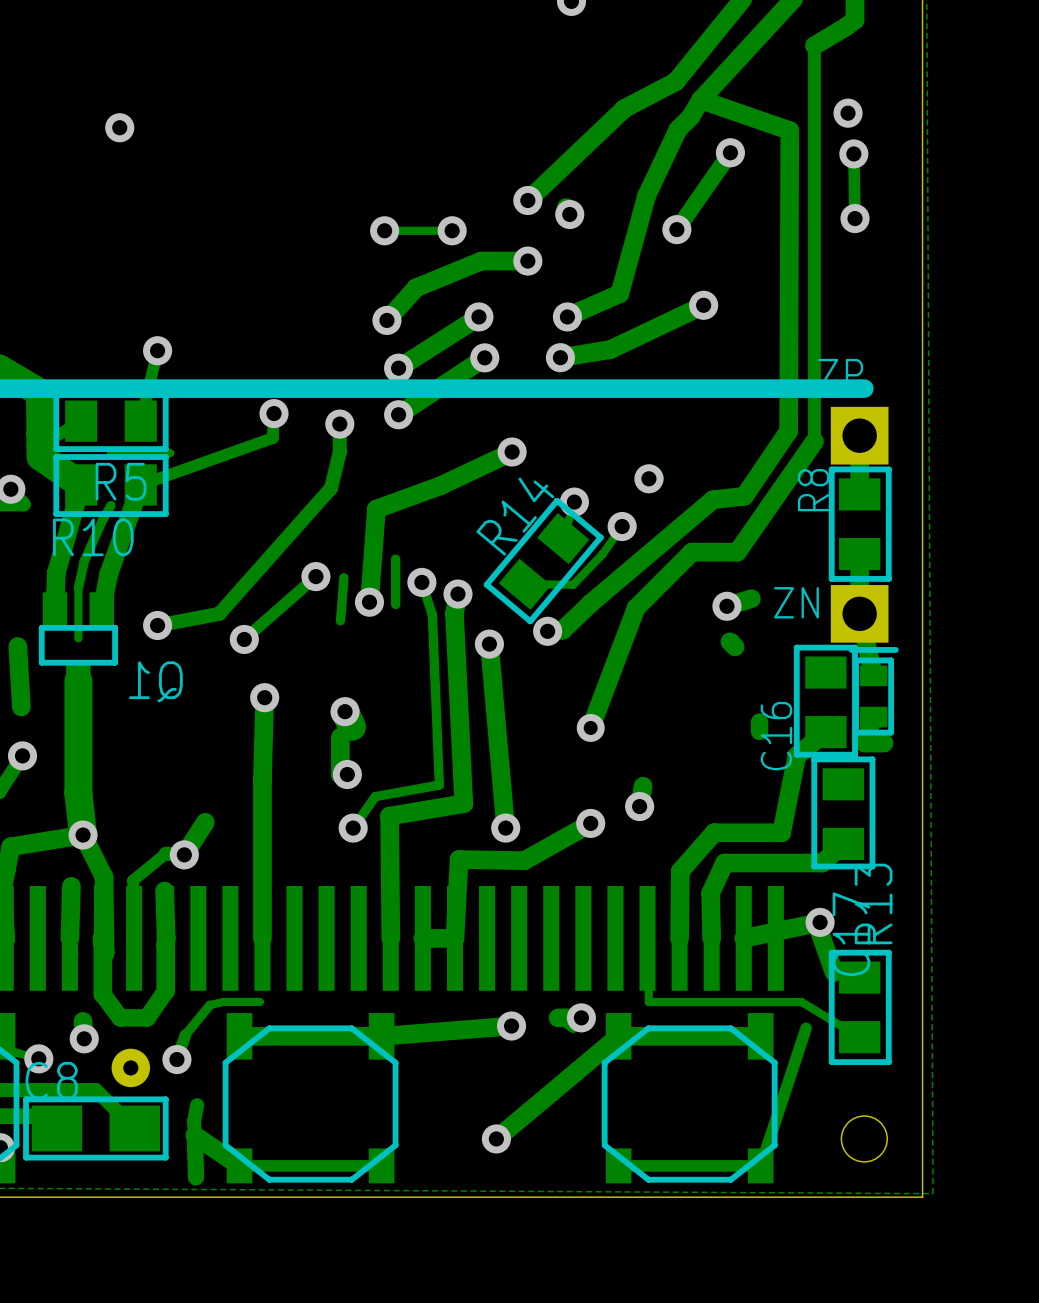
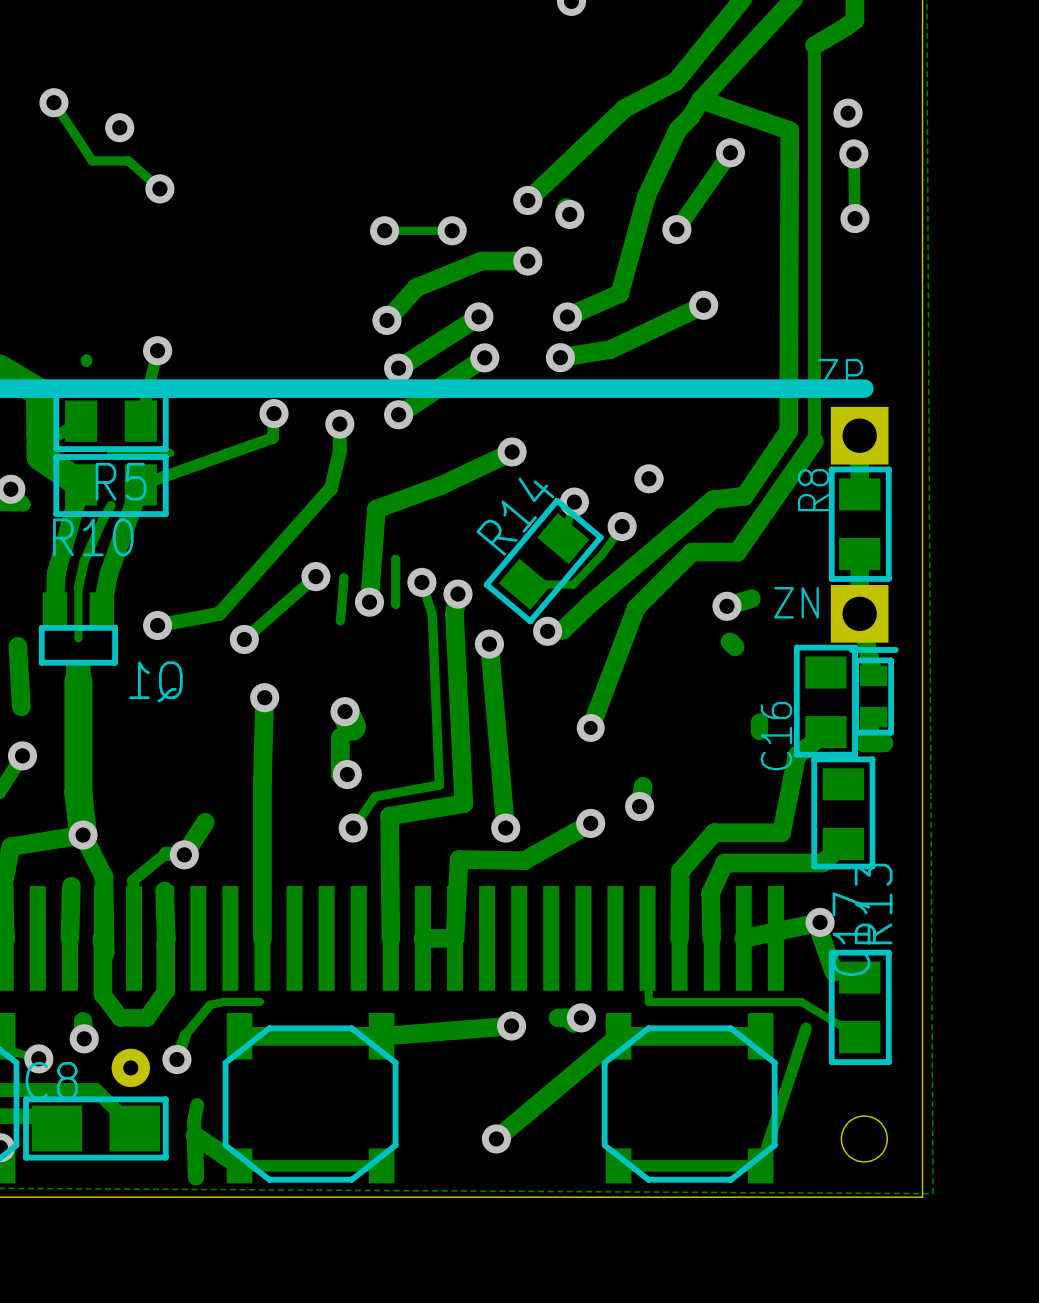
track: none -> (53, 102) (92, 160) (128, 160) (159, 188)
via: none -> (53, 102)
via: none -> (159, 188)
track: none -> (86, 360) (86, 361)

